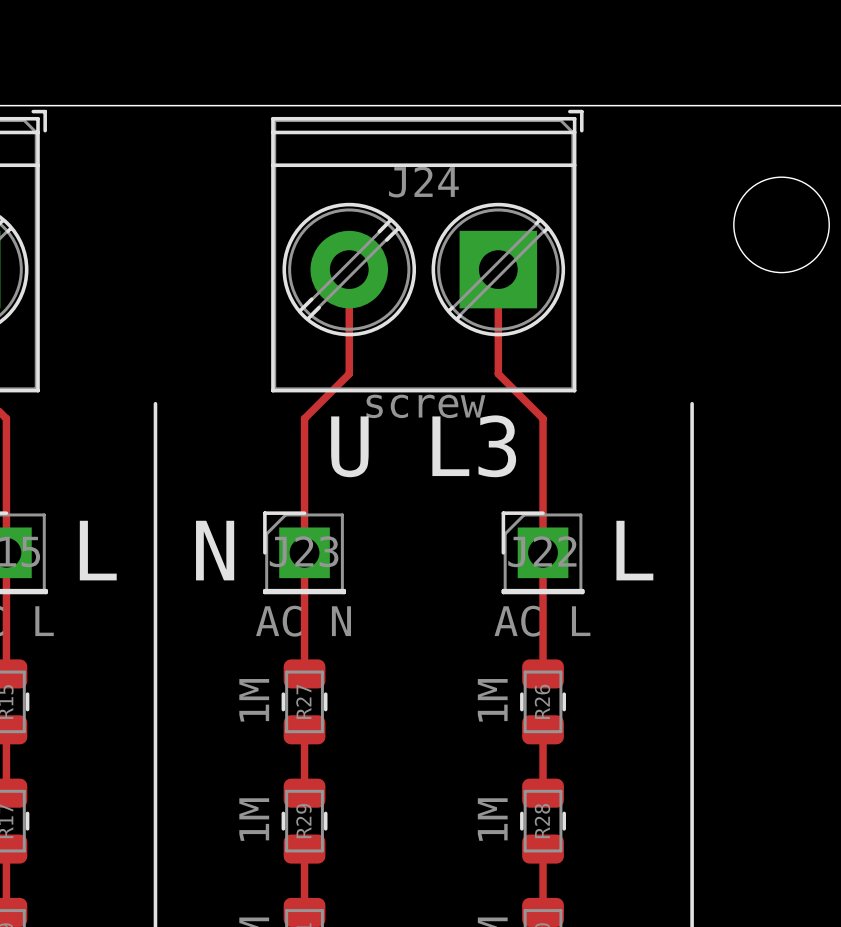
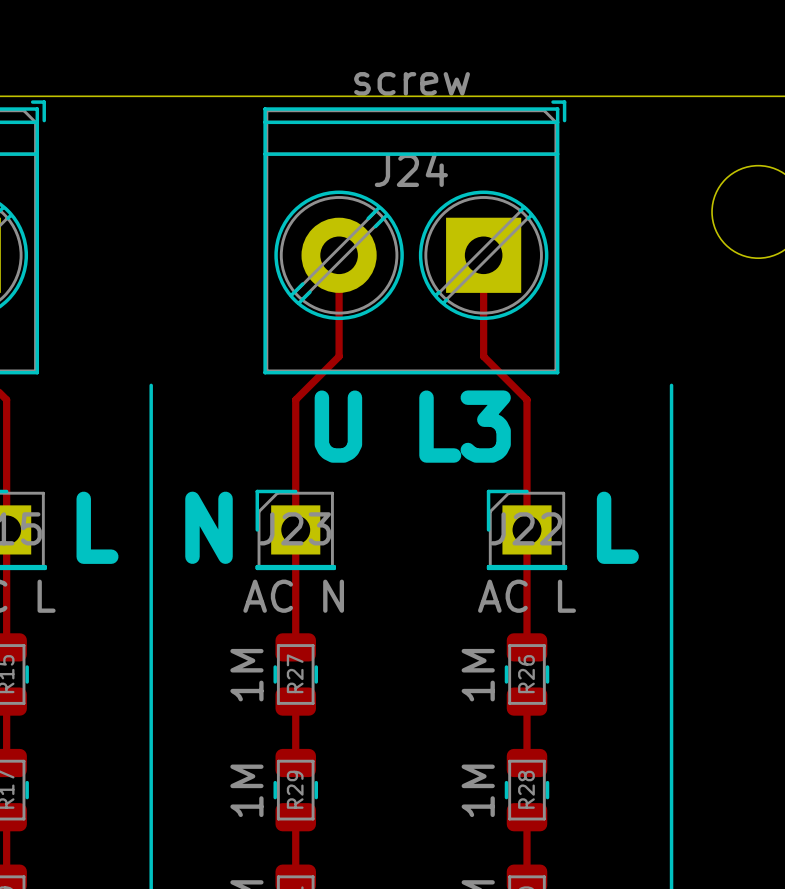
J24 value position: screw (425, 406) -> screw (412, 83)

